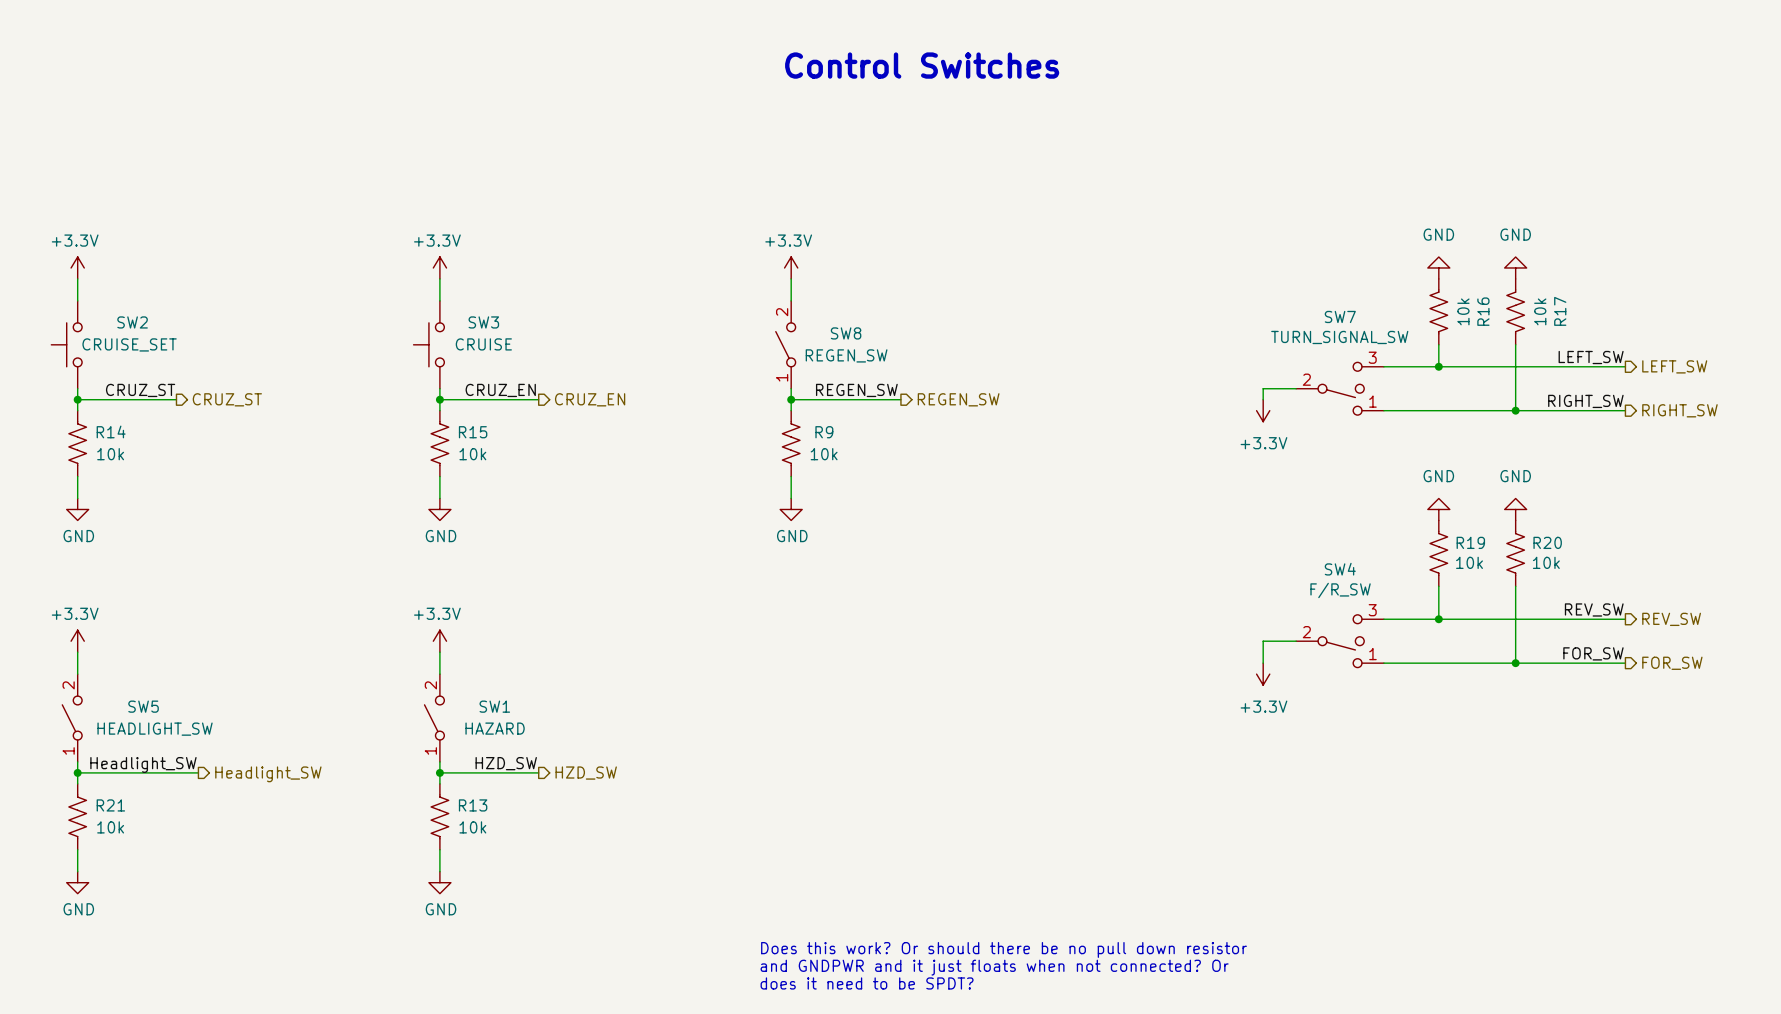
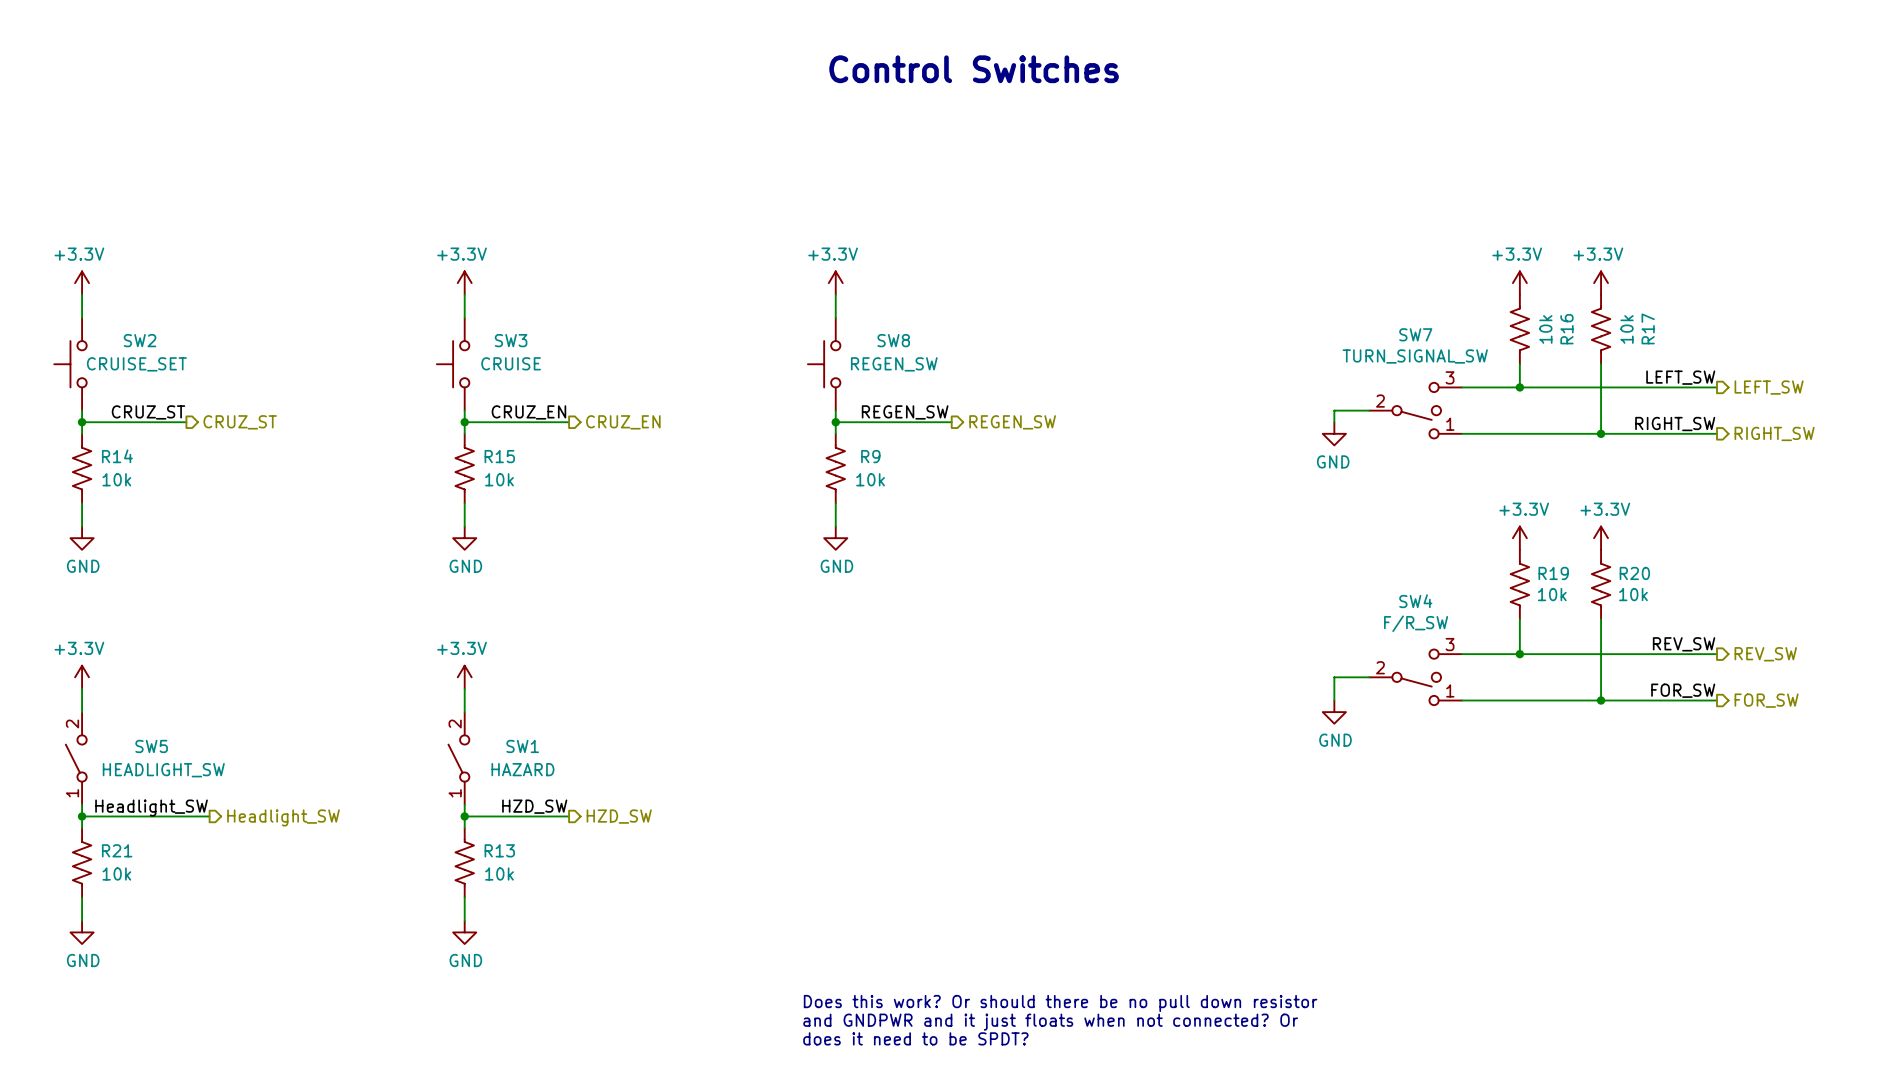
power symbol: GND (1438, 267) -> +3.3V (1519, 283)
power symbol: GND (1515, 267) -> +3.3V (1601, 283)
SW8 symbol: [775, 300, 796, 389] -> [807, 317, 841, 411]
power symbol: +3.3V (1263, 410) -> GND (1334, 433)
power symbol: GND (1438, 509) -> +3.3V (1519, 538)
power symbol: GND (1515, 509) -> +3.3V (1601, 538)
power symbol: +3.3V (1263, 674) -> GND (1334, 712)

